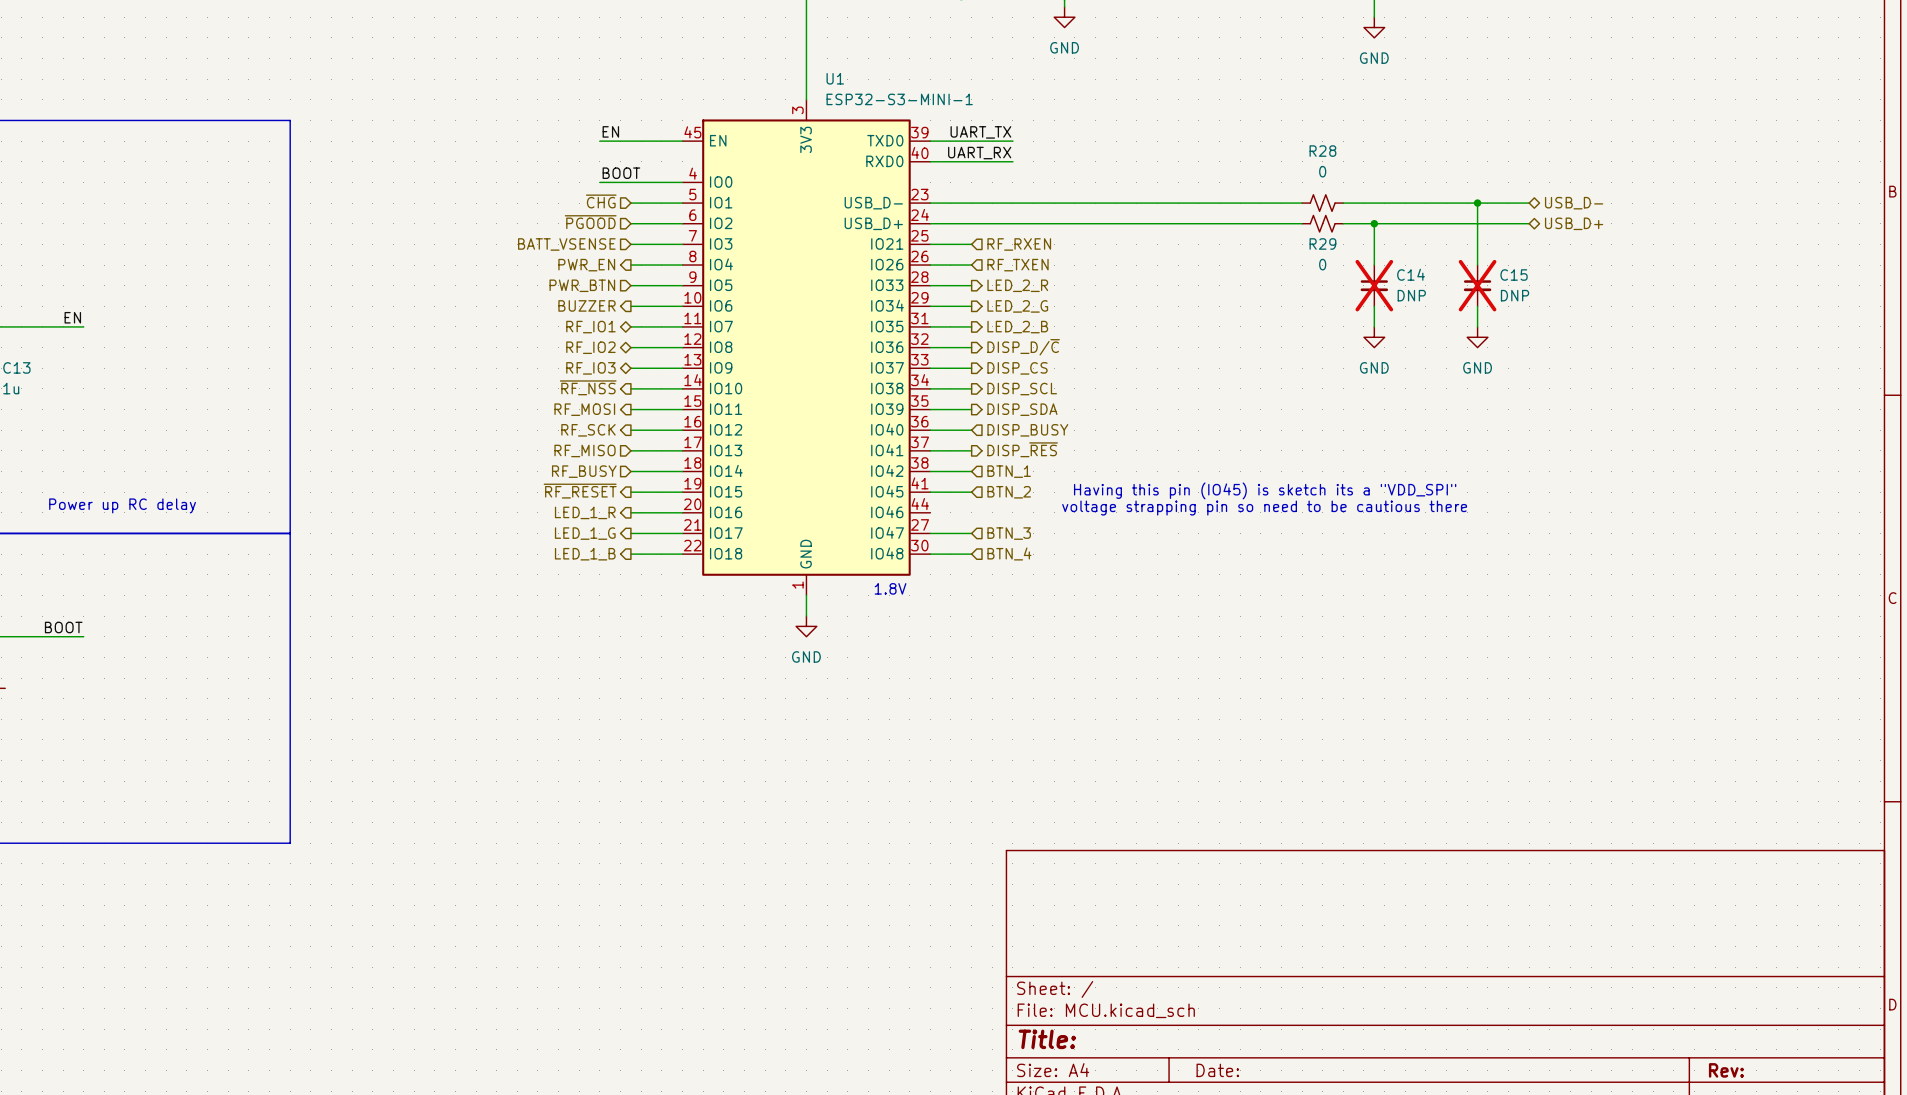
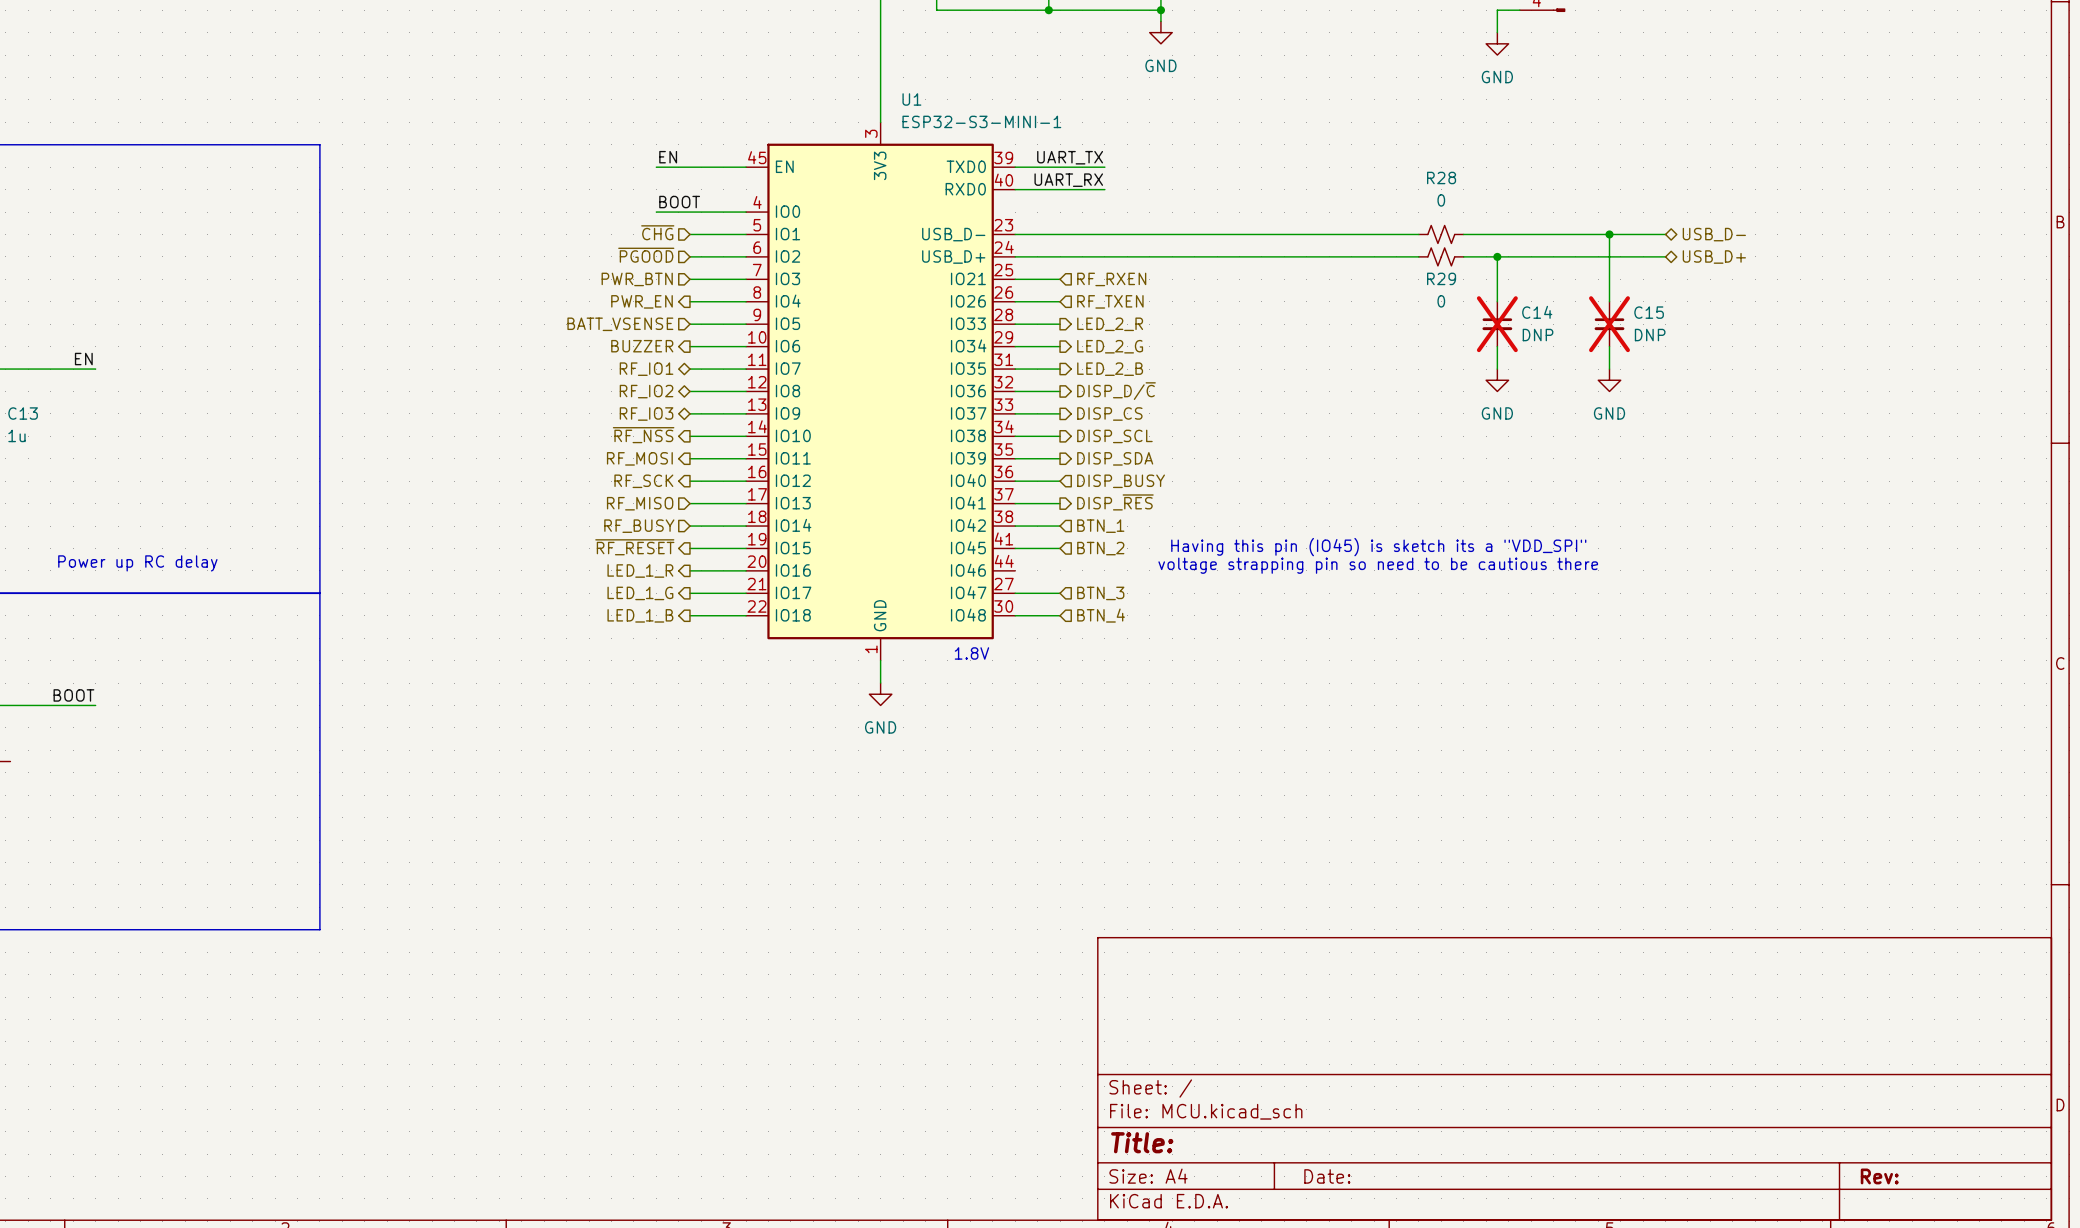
hierarchical label: BATT_VSENSE (566, 244) -> PWR_BTN (637, 279)
hierarchical label: PWR_BTN (582, 285) -> BATT_VSENSE (620, 324)

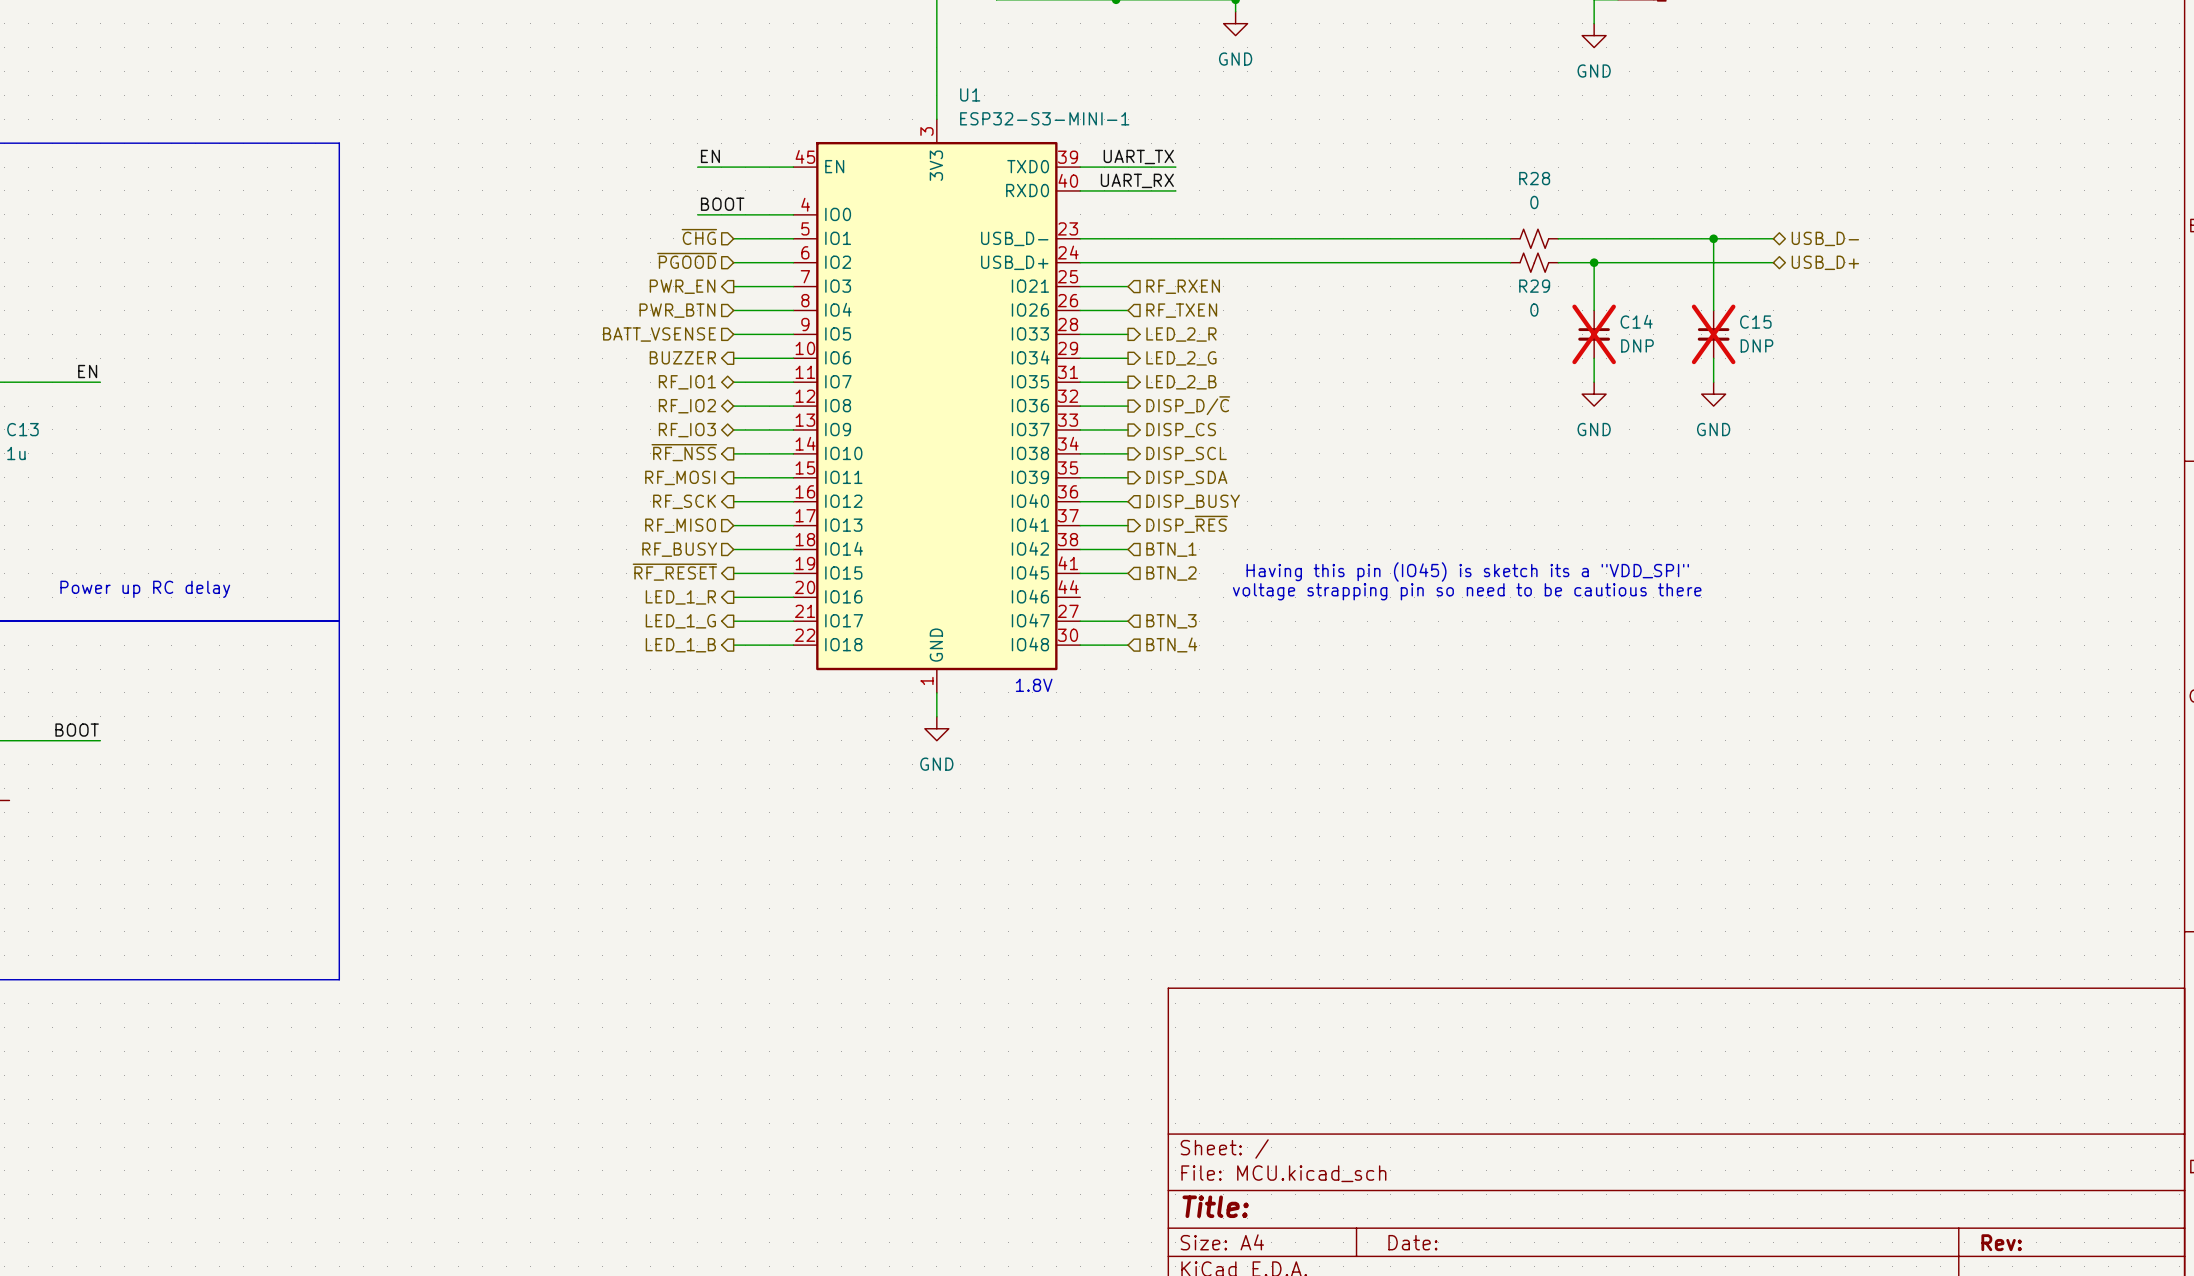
hierarchical label shape: input (637, 279) -> output (682, 286)
hierarchical label: PWR_BTN (637, 279) -> PWR_EN (682, 286)
hierarchical label shape: output (642, 301) -> input (677, 310)
hierarchical label: PWR_EN (642, 301) -> PWR_BTN (677, 310)

